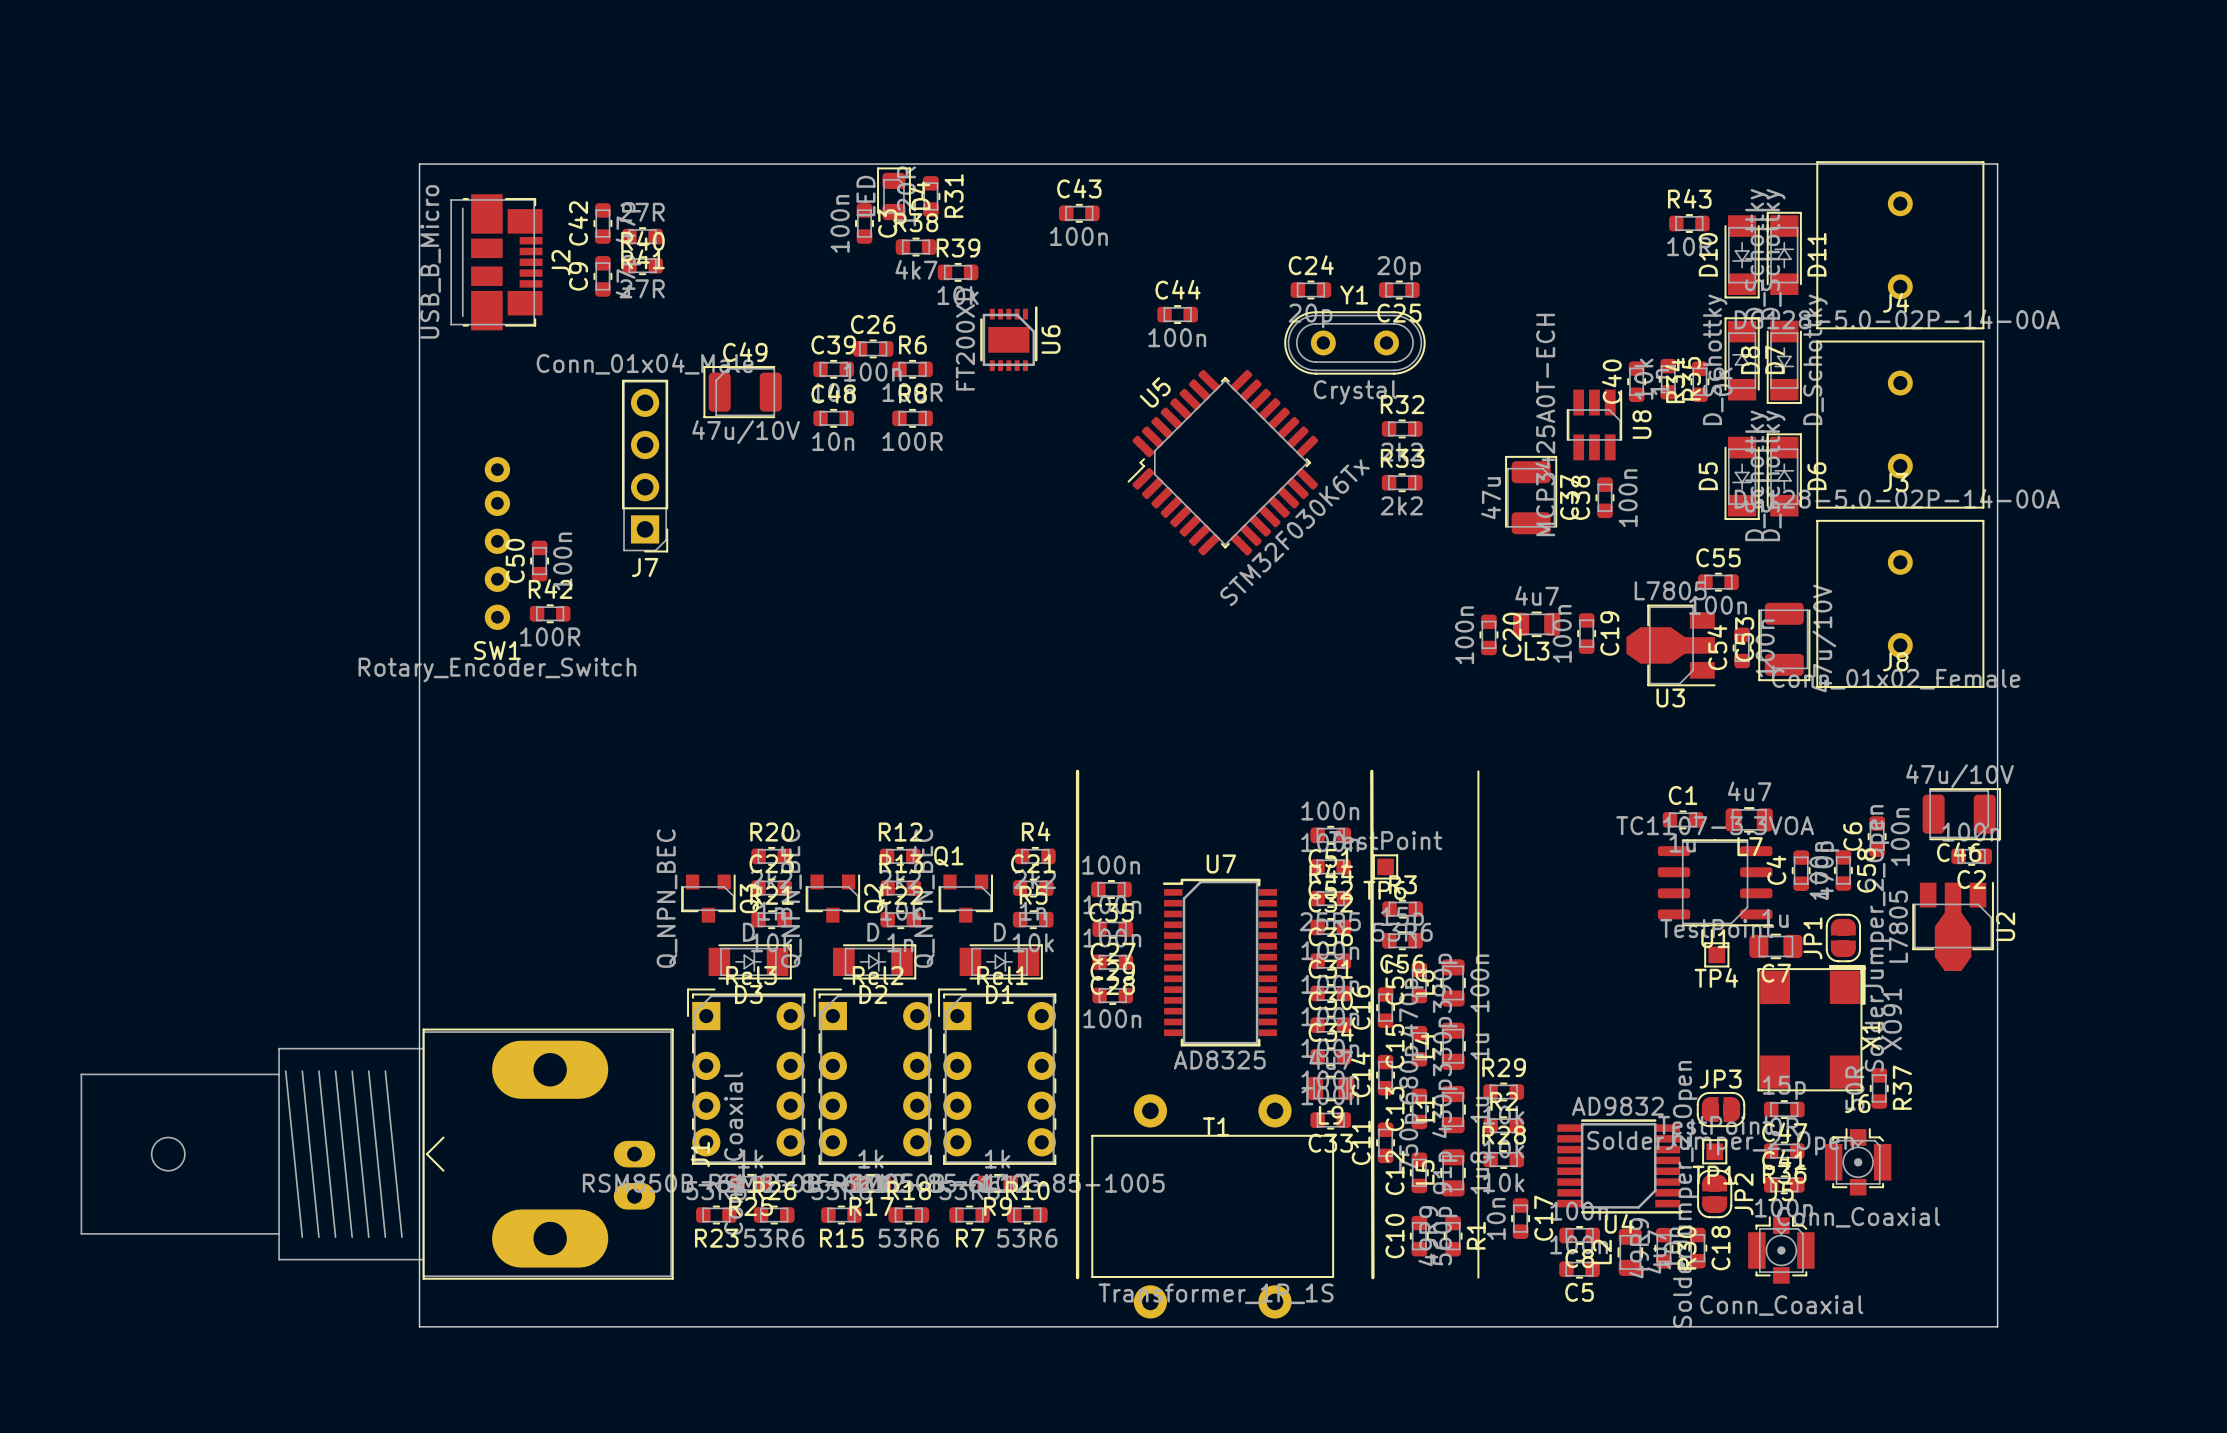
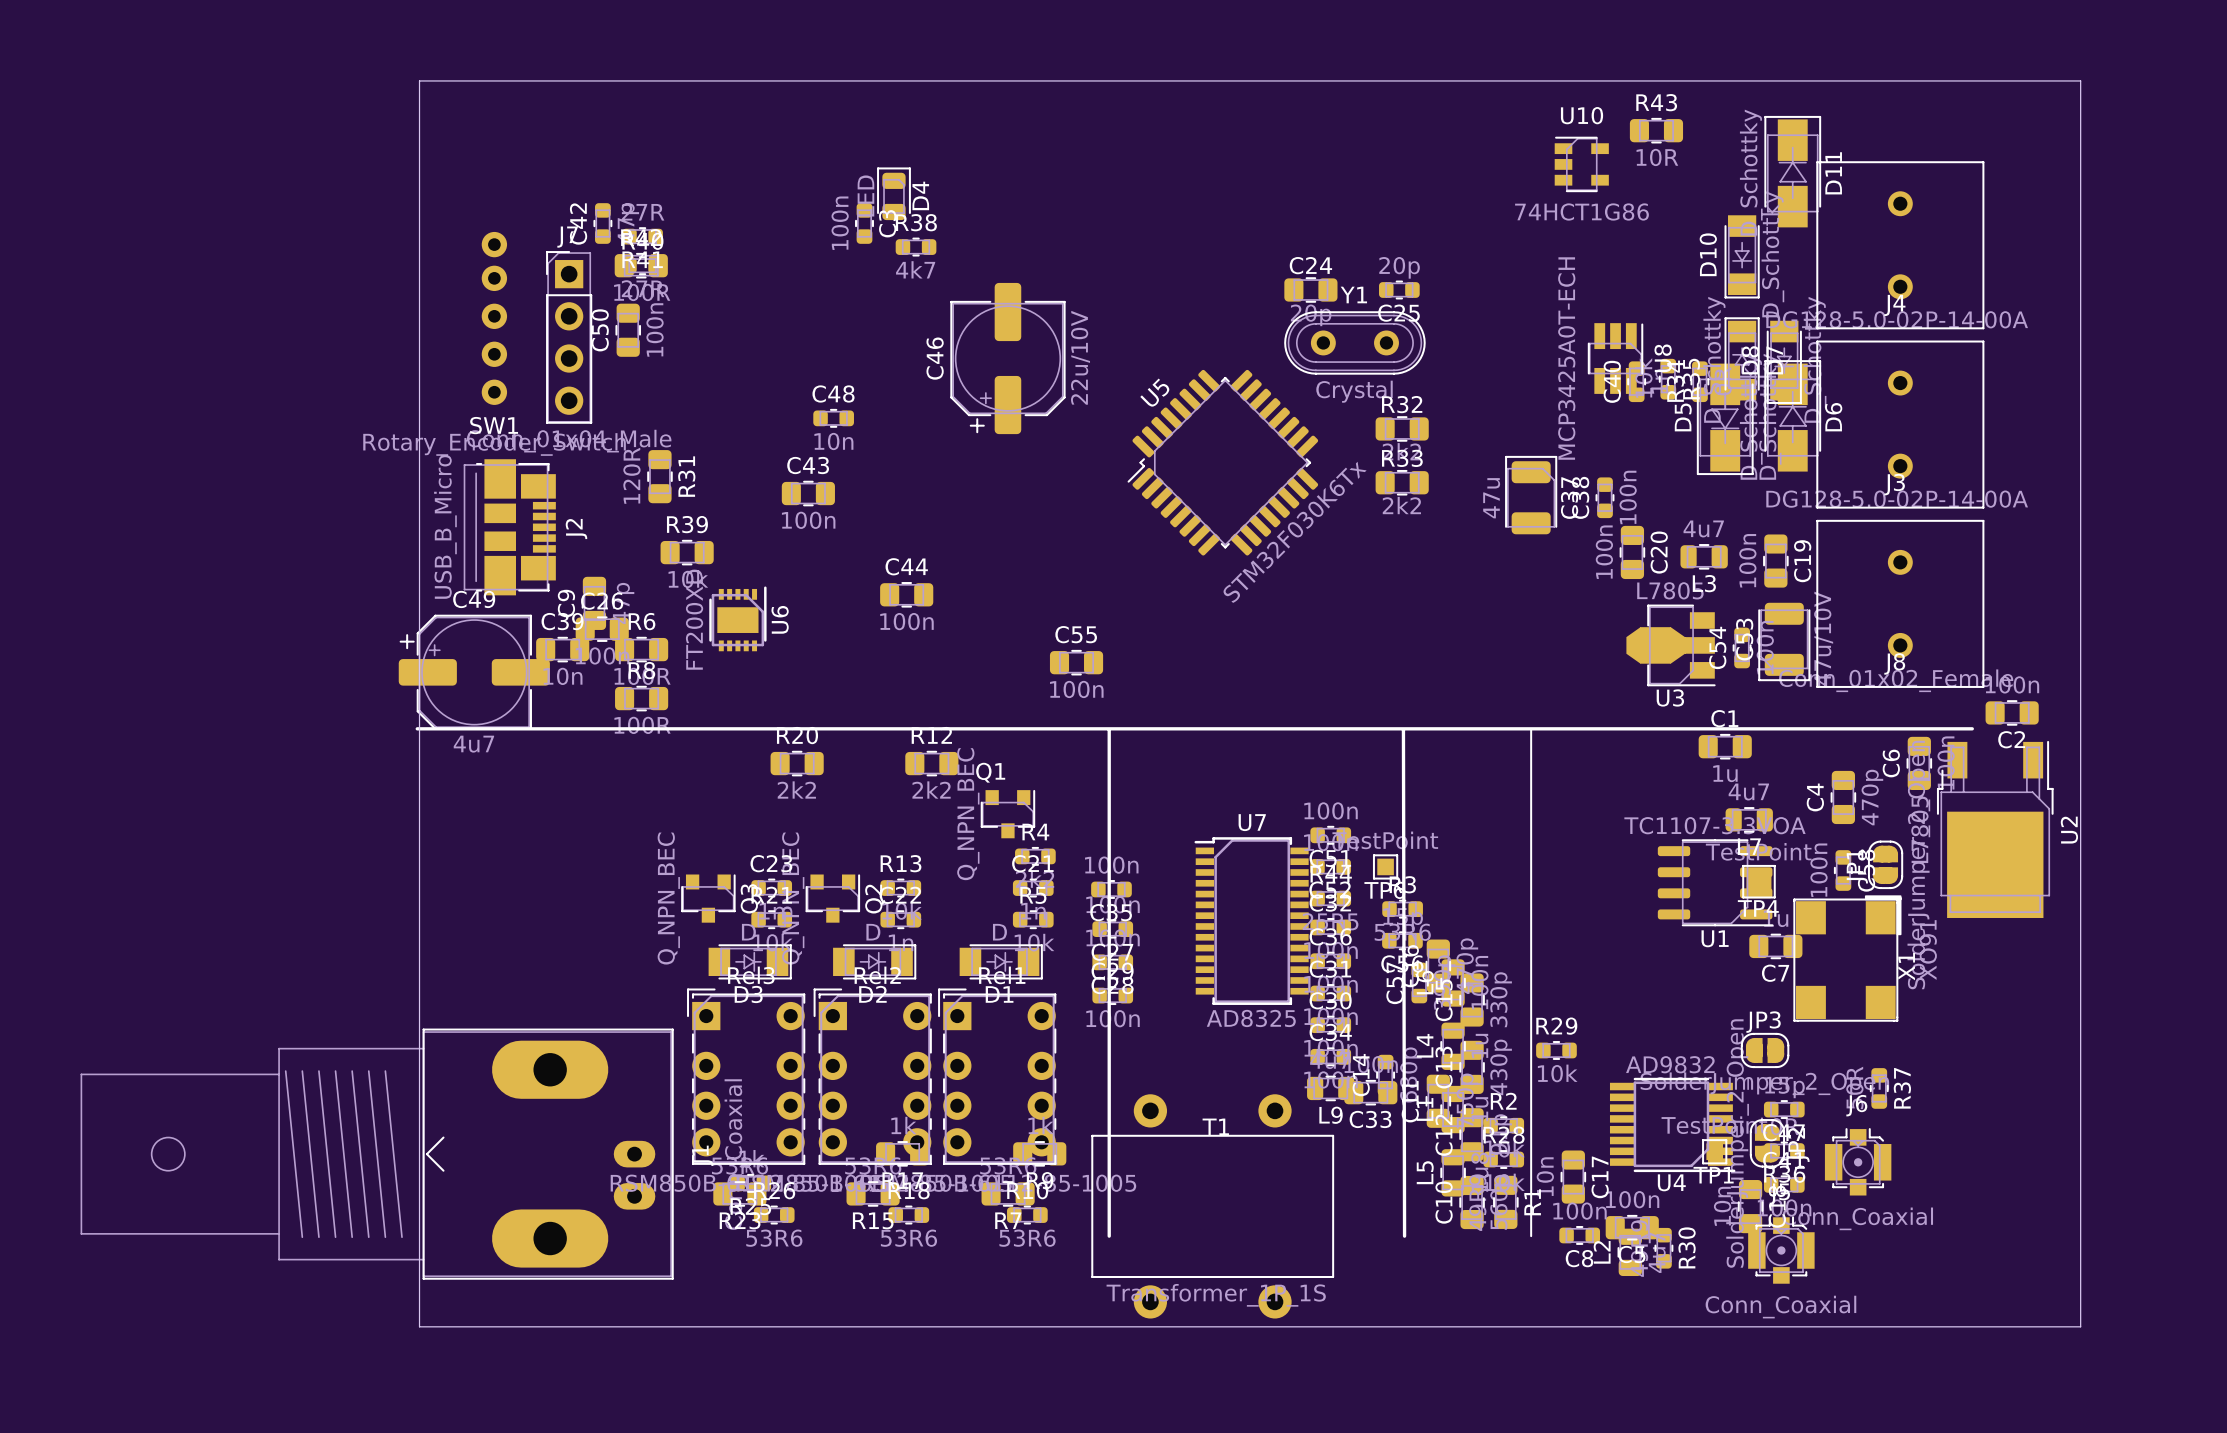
board edge: (419, 164) (1997, 164) (1997, 1326) -> (419, 164) (419, 80) (2080, 80) (2080, 1326) (1997, 1326)
U10: none -> 74HCT1G86 (1581, 164)
R31 footprint: [921, 176, 941, 217] -> [647, 450, 673, 504]
C43 footprint: [1058, 203, 1100, 223] -> [781, 480, 835, 507]
D11 footprint: [1766, 211, 1802, 296] -> [1764, 115, 1822, 228]
R43 footprint: [1669, 214, 1710, 233] -> [1629, 117, 1684, 144]
C9 footprint: [593, 256, 613, 297] -> [581, 576, 608, 630]
J2 position: (496, 262) -> (509, 527)
R39 footprint: [937, 262, 979, 282] -> [660, 539, 714, 566]
C24 footprint: [1290, 280, 1332, 300] -> [1284, 277, 1338, 303]
C44 footprint: [1157, 305, 1198, 325] -> [880, 582, 934, 608]
U6 position: (1008, 338) -> (737, 618)
C26 footprint: [852, 339, 894, 359] -> [575, 616, 629, 642]
C49 name position: C49 (745, 352) -> C49 (474, 599)
C39 footprint: [813, 359, 854, 379] -> [536, 636, 590, 663]
R6 footprint: [892, 359, 933, 379] -> [615, 636, 669, 663]
C49 footprint: [703, 366, 782, 419] -> [398, 614, 550, 730]
R8 footprint: [892, 408, 933, 428] -> [615, 685, 669, 712]
R32 footprint: [1381, 419, 1423, 439] -> [1375, 416, 1429, 442]
U8 position: (1594, 424) -> (1615, 358)
C49 value: 47u/10V (746, 432) -> 4u7 (473, 744)
D6 footprint: [1766, 433, 1802, 517] -> [1764, 360, 1822, 472]
D5 footprint: [1724, 436, 1760, 521] -> [1696, 363, 1754, 476]
J7 rotation: 0° (645, 466) -> 180° (569, 337)
J7 position: (645, 466) -> (569, 337)
R33 footprint: [1381, 473, 1423, 493] -> [1375, 469, 1429, 496]
C50 footprint: [530, 540, 550, 582] -> [615, 303, 642, 357]
SW1 position: (497, 543) -> (494, 318)
C55 footprint: [1698, 572, 1739, 592] -> [1049, 649, 1104, 676]
R42 footprint: [529, 604, 571, 624] -> [614, 252, 668, 279]
C19 footprint: [1577, 613, 1597, 654] -> [1763, 534, 1789, 588]
C20 footprint: [1479, 614, 1499, 656] -> [1619, 525, 1646, 580]
L3 position: (1536, 624) -> (1704, 556)
line: none -> (417, 728) (1972, 728)
line: (1077, 771) (1077, 1277) -> (1109, 729) (1109, 1236)
line: (1371, 771) (1372, 1277) -> (1403, 729) (1404, 1236)
line: (1478, 771) (1478, 1277) -> (1531, 729) (1531, 1236)
C46 value: 47u/10V (1959, 776) -> 22u/10V (1080, 357)
C46 footprint: [1922, 788, 2002, 841] -> [950, 282, 1066, 435]
C1 footprint: [1662, 810, 1704, 830] -> [1698, 733, 1752, 760]
C6 footprint: [1867, 816, 1887, 857] -> [1906, 736, 1933, 791]
R20 footprint: [751, 846, 793, 866] -> [770, 750, 824, 777]
R12 footprint: [879, 846, 921, 866] -> [905, 750, 959, 777]
C2 footprint: [1951, 846, 1992, 866] -> [1985, 700, 2039, 726]
C4 footprint: [1791, 850, 1811, 891] -> [1830, 770, 1857, 825]
C46 name position: C46 (1959, 852) -> C46 (935, 358)
U2 footprint: [1912, 881, 1994, 972] -> [1936, 740, 2054, 918]
Q1 position: (965, 898) -> (1007, 814)
JP1 position: (1843, 938) -> (1885, 864)
TP4 footprint: [1704, 942, 1730, 968] -> [1742, 864, 1776, 899]
U7 position: (1219, 962) -> (1251, 921)
C16 footprint: [1376, 987, 1396, 1028] -> [1425, 939, 1452, 993]
C15 footprint: [1409, 1025, 1429, 1067] -> [1459, 973, 1485, 1027]
X1 position: (1811, 1028) -> (1847, 958)
C13 footprint: [1409, 1088, 1429, 1130] -> [1459, 1040, 1485, 1094]
R29 position: (1503, 1092) -> (1556, 1050)
JP3 position: (1721, 1109) -> (1765, 1050)
C33 footprint: [1310, 1110, 1352, 1130] -> [1344, 1079, 1398, 1106]
C11 footprint: [1376, 1122, 1396, 1164] -> [1425, 1074, 1452, 1128]
C12 footprint: [1409, 1152, 1429, 1194] -> [1459, 1108, 1485, 1162]
U4 position: (1619, 1166) -> (1672, 1124)
R17 footprint: [850, 1173, 892, 1193] -> [876, 1141, 930, 1167]
R9 footprint: [977, 1173, 1018, 1193] -> [1013, 1141, 1067, 1167]
JP2 position: (1714, 1193) -> (1767, 1143)
C17 footprint: [1511, 1198, 1531, 1239] -> [1560, 1150, 1587, 1204]
R23 footprint: [696, 1205, 737, 1225] -> [713, 1181, 767, 1207]
R15 footprint: [821, 1205, 862, 1225] -> [846, 1181, 900, 1207]
R7 footprint: [949, 1205, 990, 1225] -> [981, 1181, 1035, 1207]
C10 footprint: [1409, 1215, 1429, 1257] -> [1459, 1175, 1485, 1230]
R1 footprint: [1443, 1215, 1463, 1257] -> [1493, 1175, 1519, 1229]
C18 footprint: [1688, 1227, 1708, 1269] -> [1737, 1180, 1764, 1234]
C5 footprint: [1559, 1259, 1600, 1279] -> [1605, 1214, 1659, 1241]

